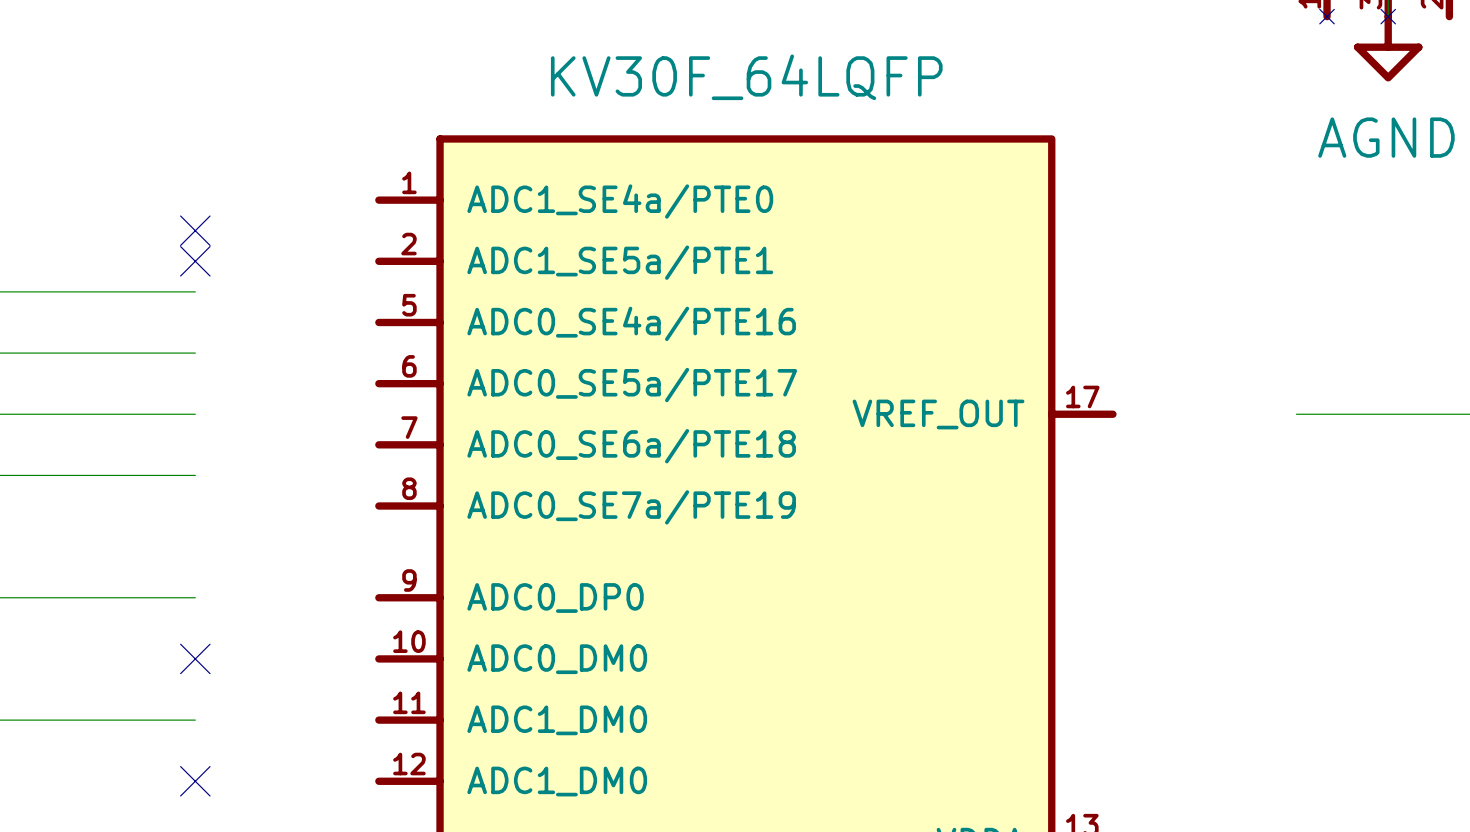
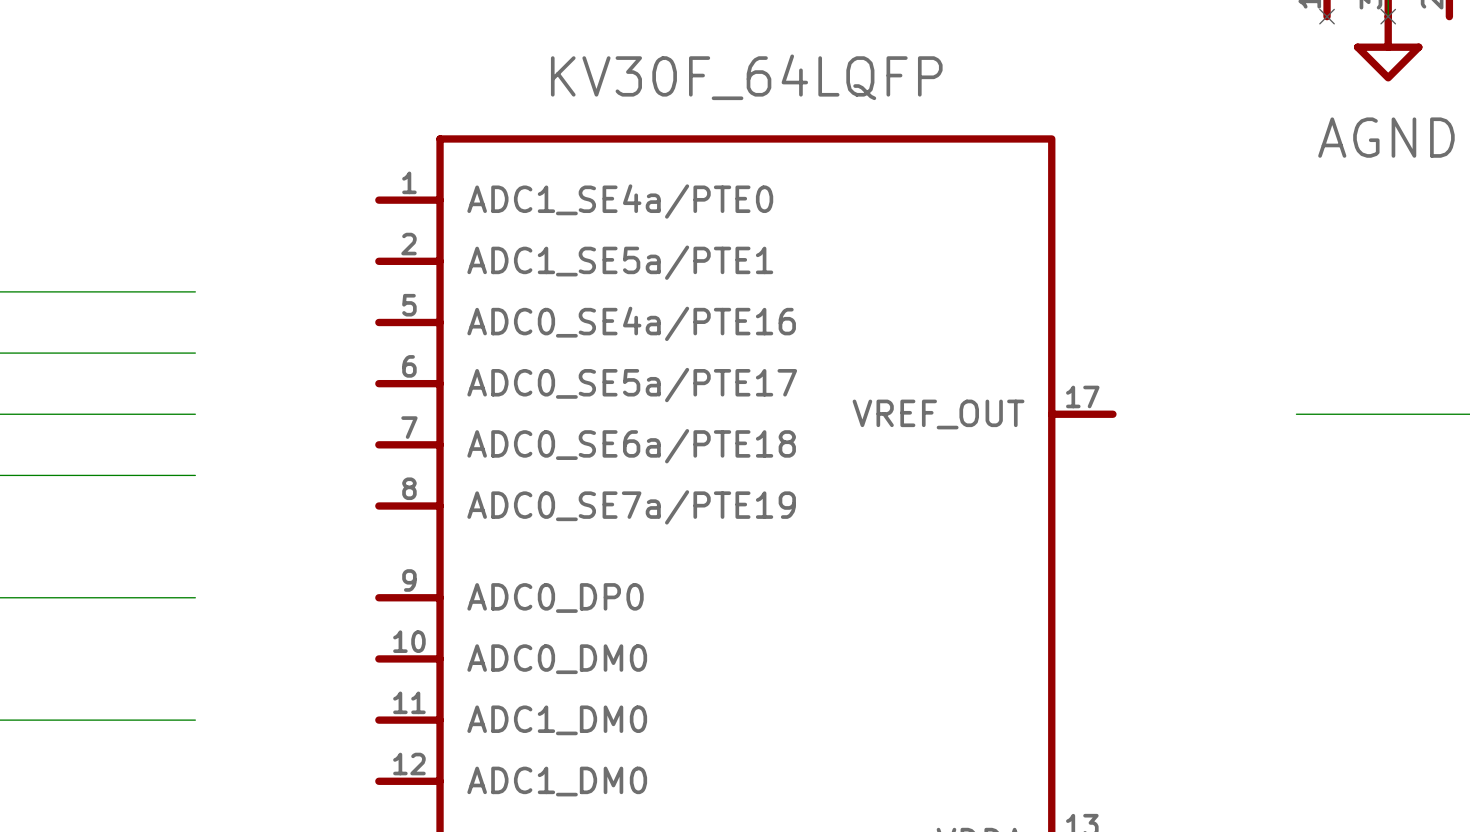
no-connect mark: (195, 230) -> none
no-connect mark: (195, 261) -> none
no-connect mark: (195, 658) -> none
no-connect mark: (195, 781) -> none

